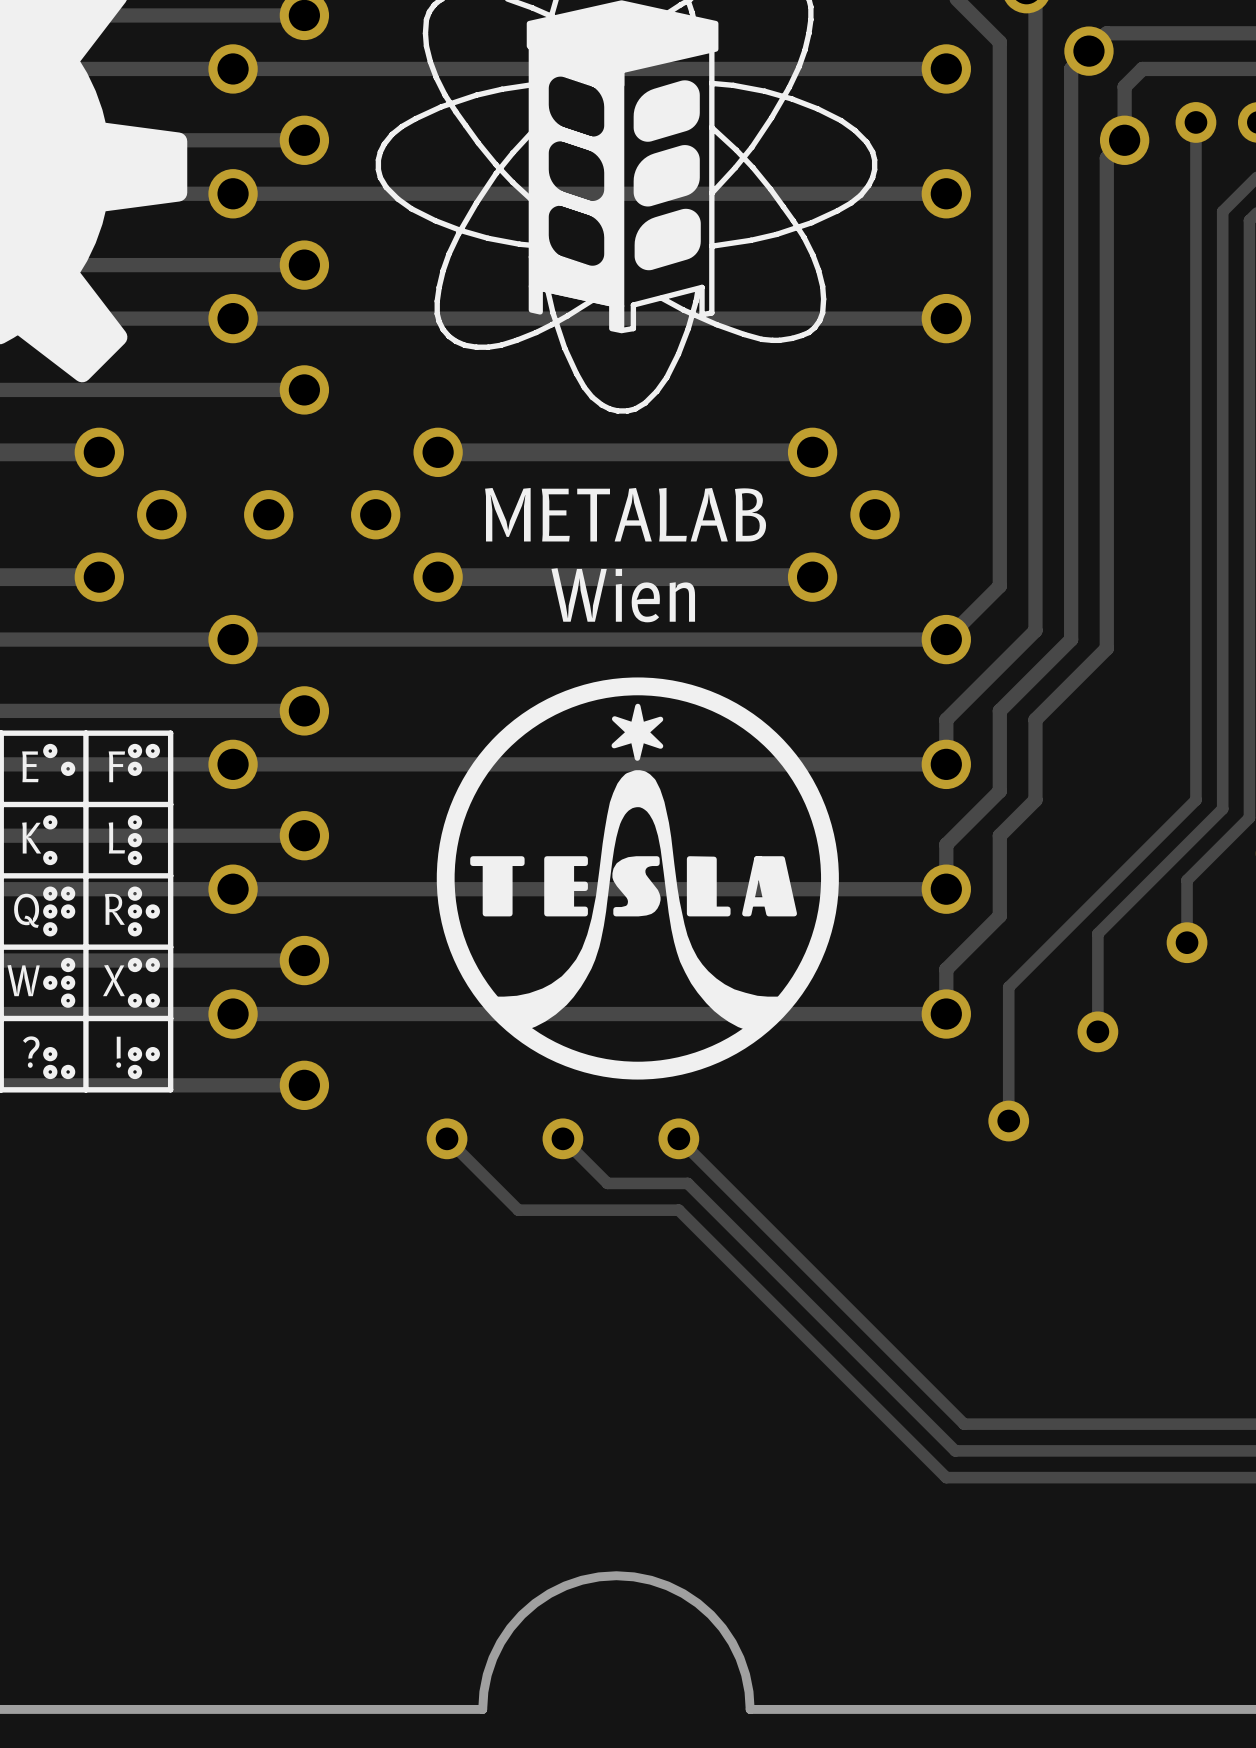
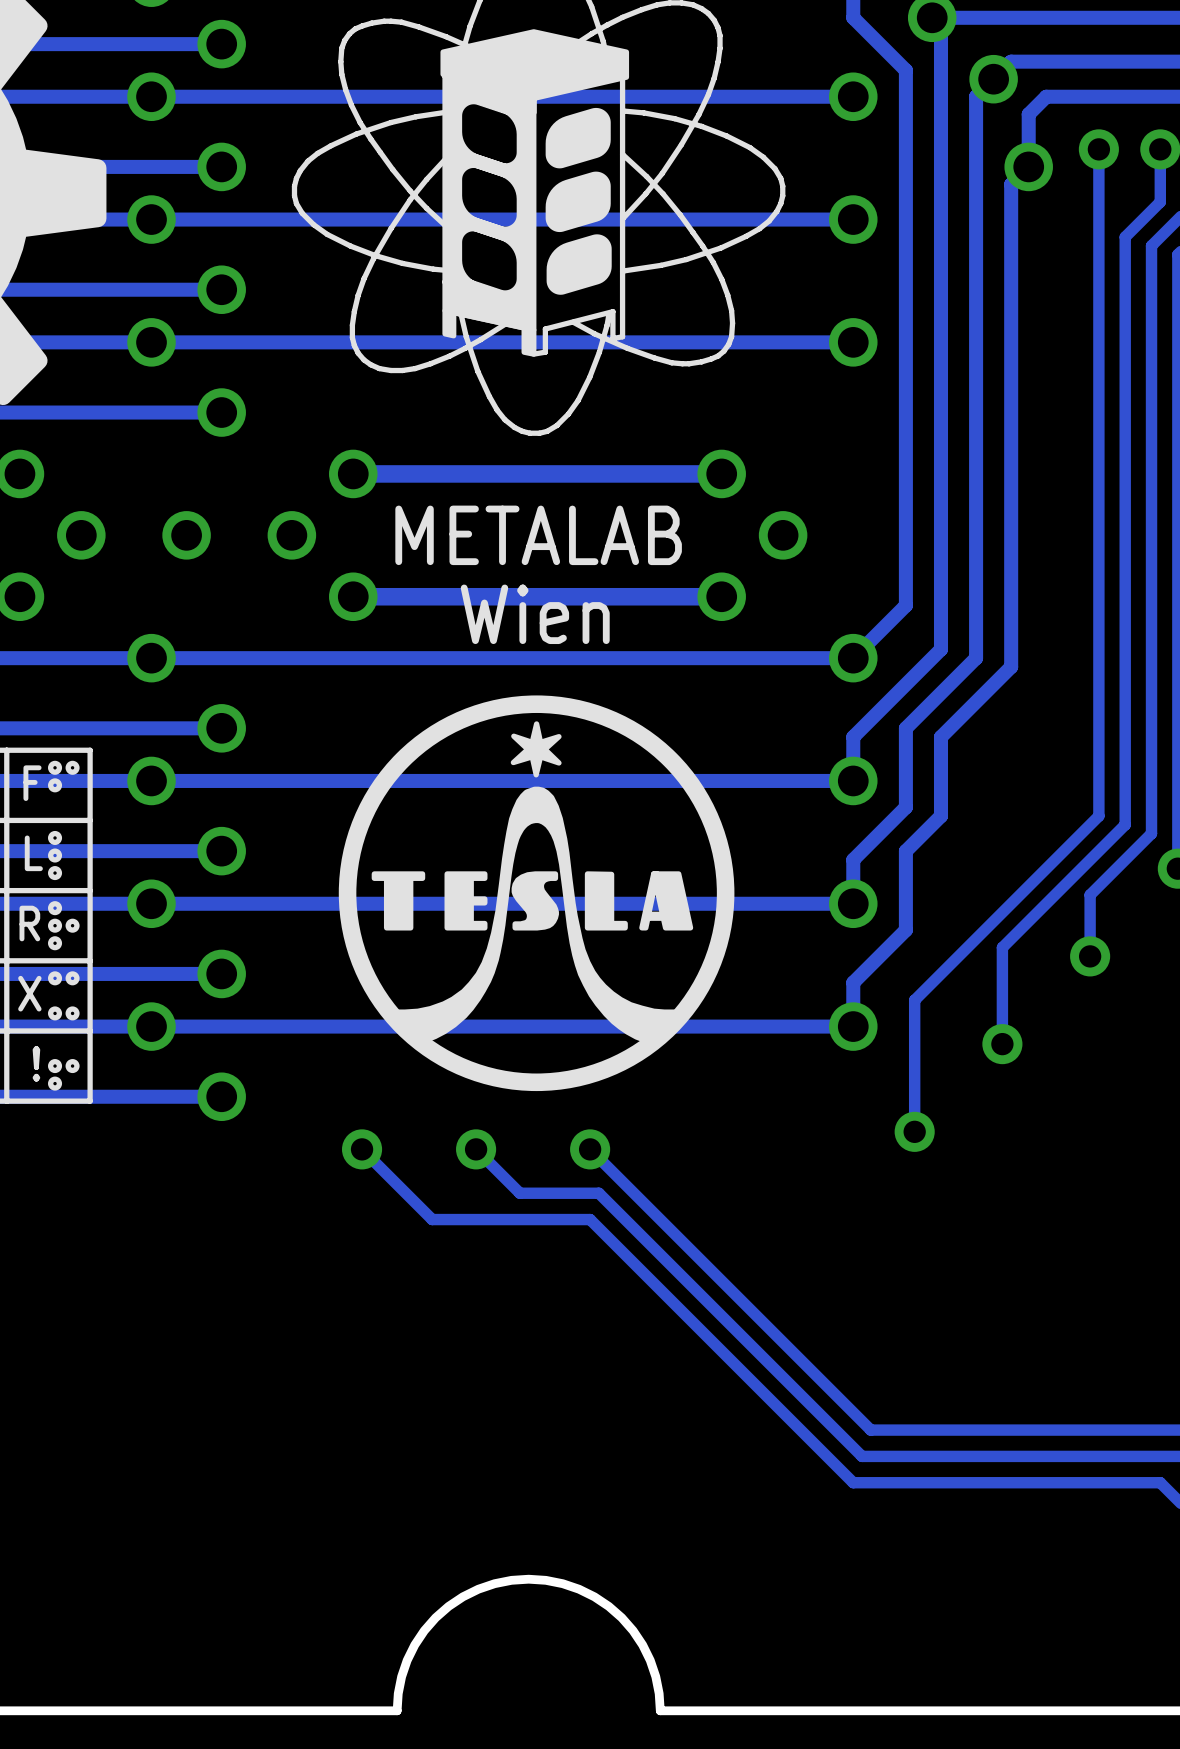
drawing position: (637, 732) -> (536, 749)
drawing position: (637, 878) -> (536, 893)
drawing position: (497, 886) -> (398, 900)
drawing position: (566, 886) -> (465, 900)
drawing position: (636, 886) -> (535, 900)
drawing position: (708, 886) -> (606, 900)
drawing position: (752, 886) -> (649, 900)
drawing position: (771, 886) -> (668, 900)
drawing position: (639, 901) -> (538, 916)

